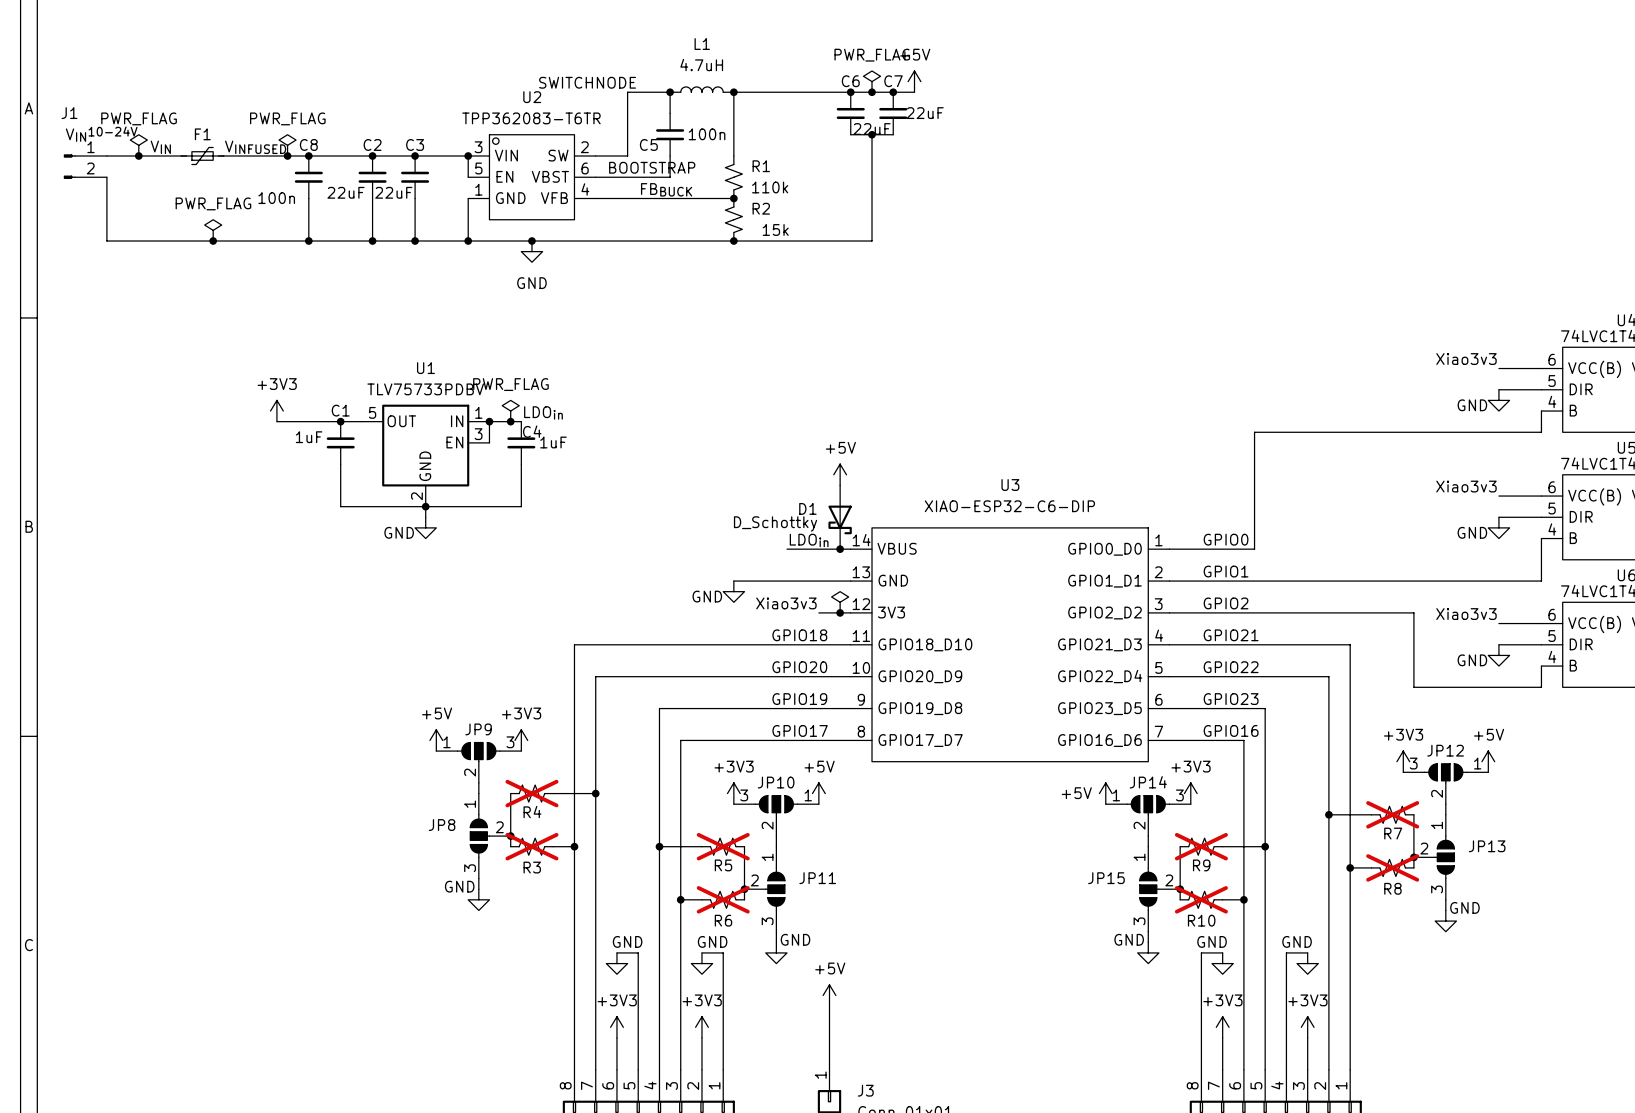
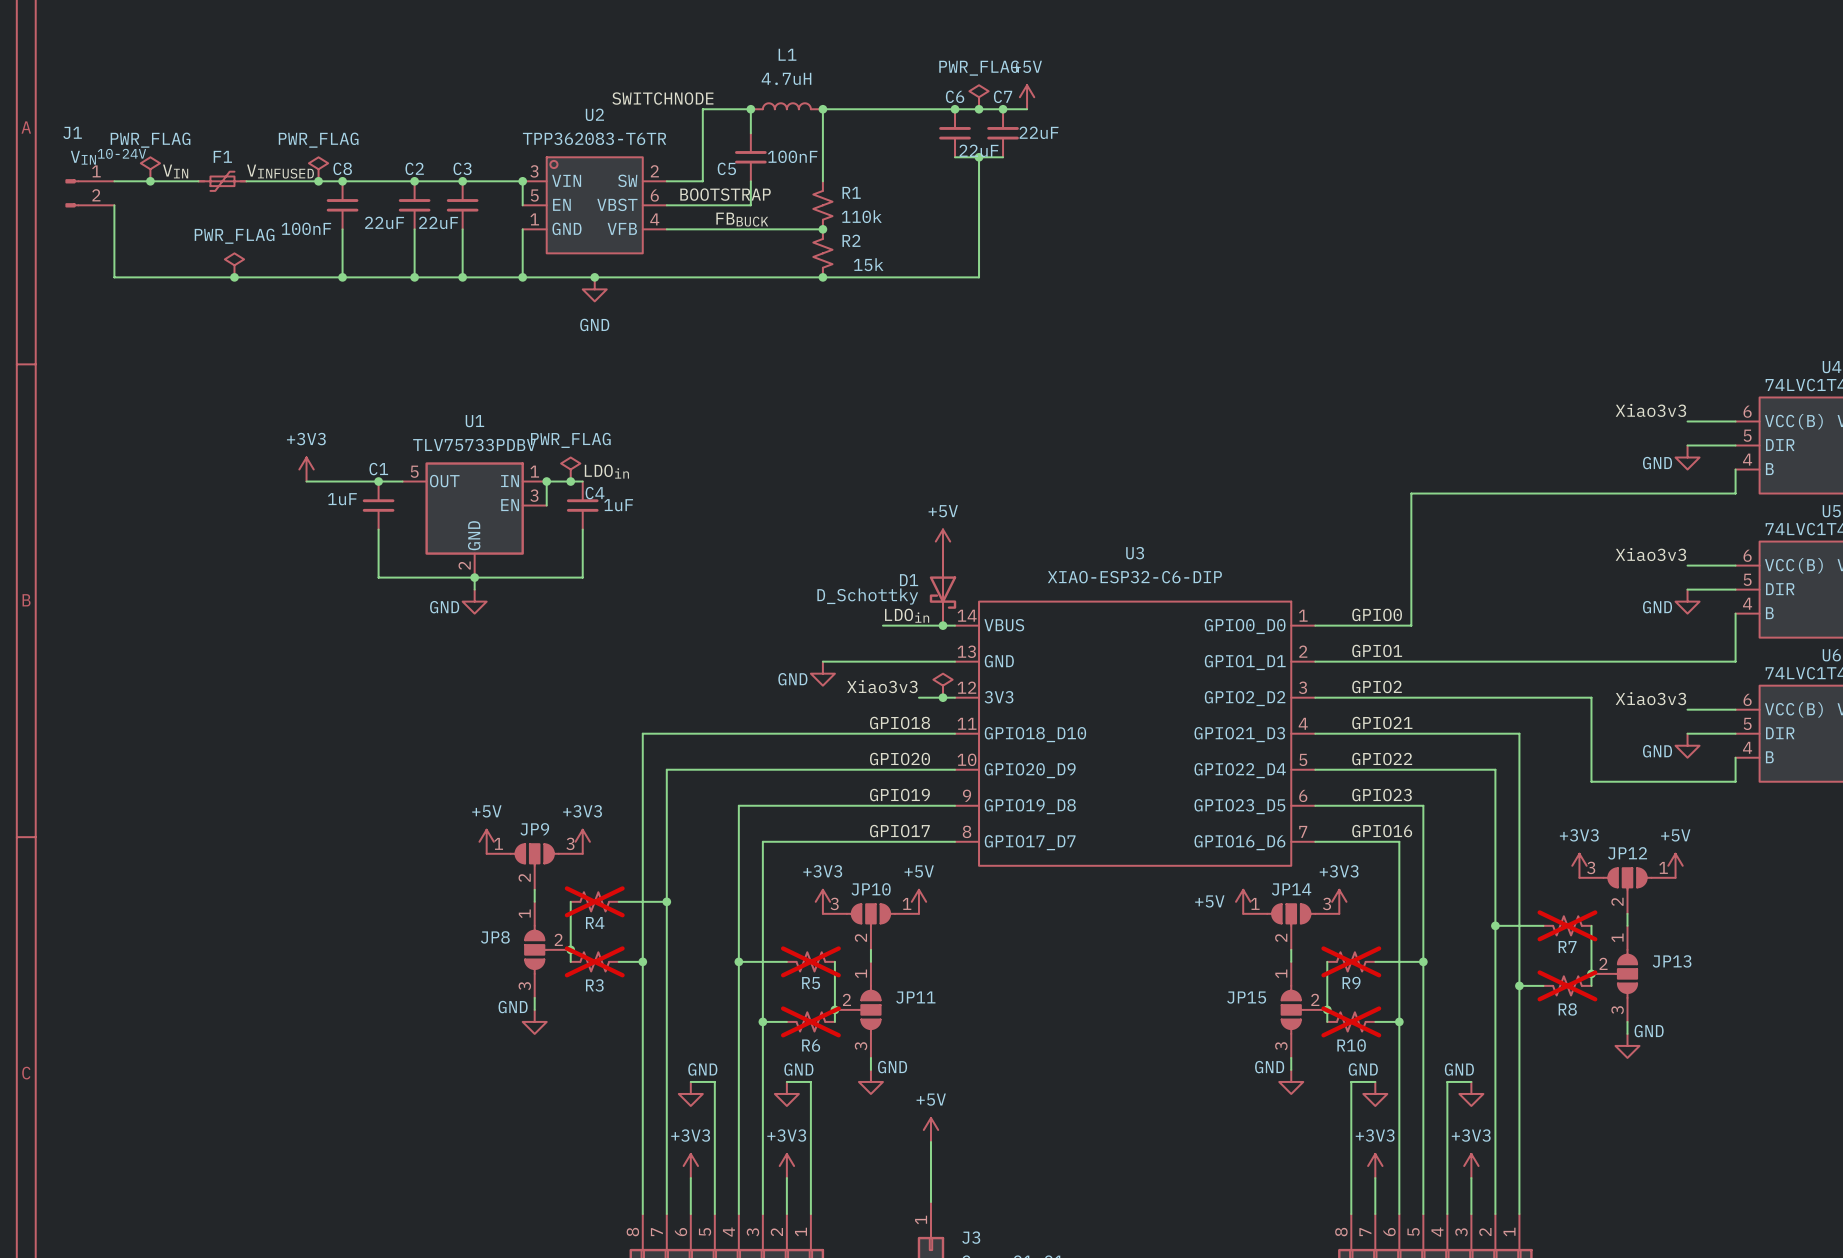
C5 value: 100n (707, 134) -> 100nF (792, 156)
C8 value: 100n (276, 198) -> 100nF (306, 228)

